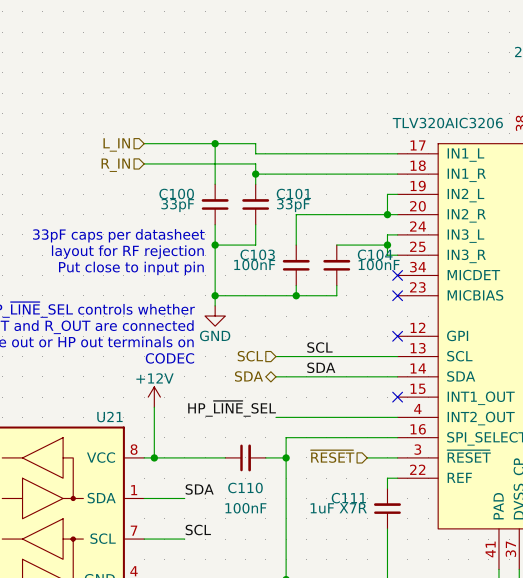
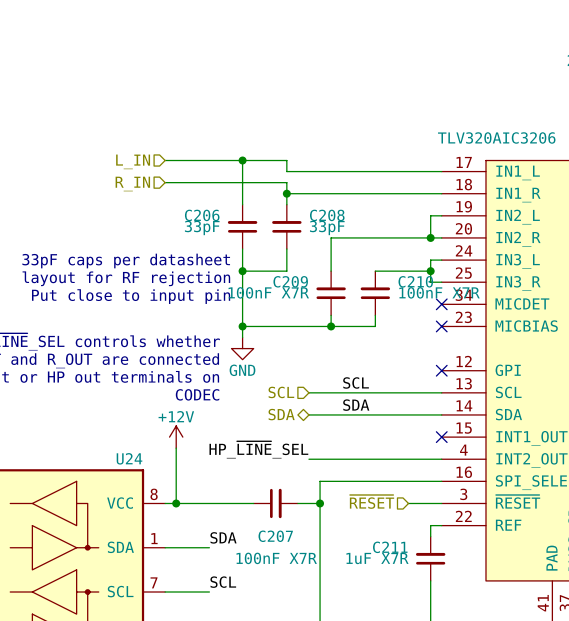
C100 name: C100 (176, 194) -> C206 (202, 215)
C101 name: C101 (293, 194) -> C208 (327, 215)
C103 name: C103 (257, 254) -> C209 (290, 281)
C104 name: C104 (375, 254) -> C210 (415, 281)
C103 value: 100nF (254, 264) -> 100nF X7R (268, 292)
C104 value: 100nF (379, 264) -> 100nF X7R (439, 292)
U21 name: U21 (109, 417) -> U24 (129, 458)
C110 name: C110 (245, 487) -> C207 (275, 536)
C111 name: C111 (348, 498) -> C211 (390, 547)
C110 value: 100nF (245, 508) -> 100nF X7R (276, 558)

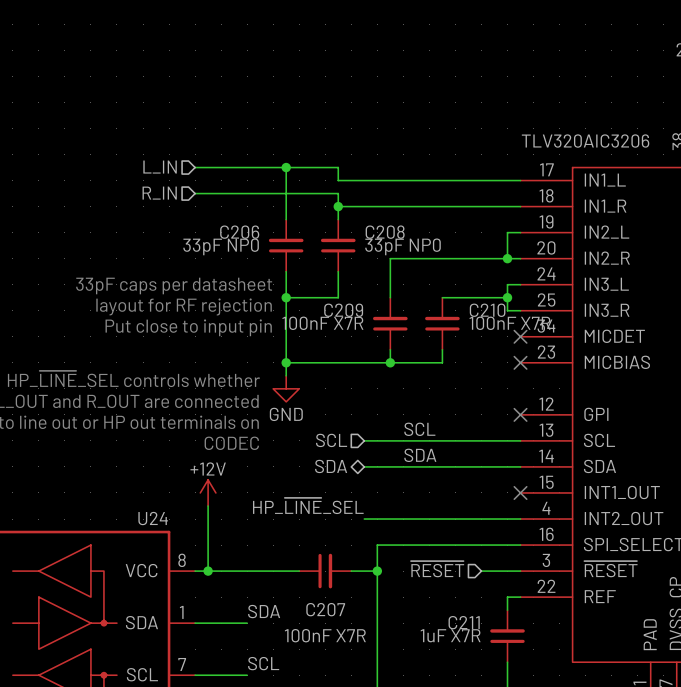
C206 value: 33pF (202, 227) -> 33pF NP0 (221, 246)
C208 value: 33pF (327, 227) -> 33pF NP0 (403, 246)

